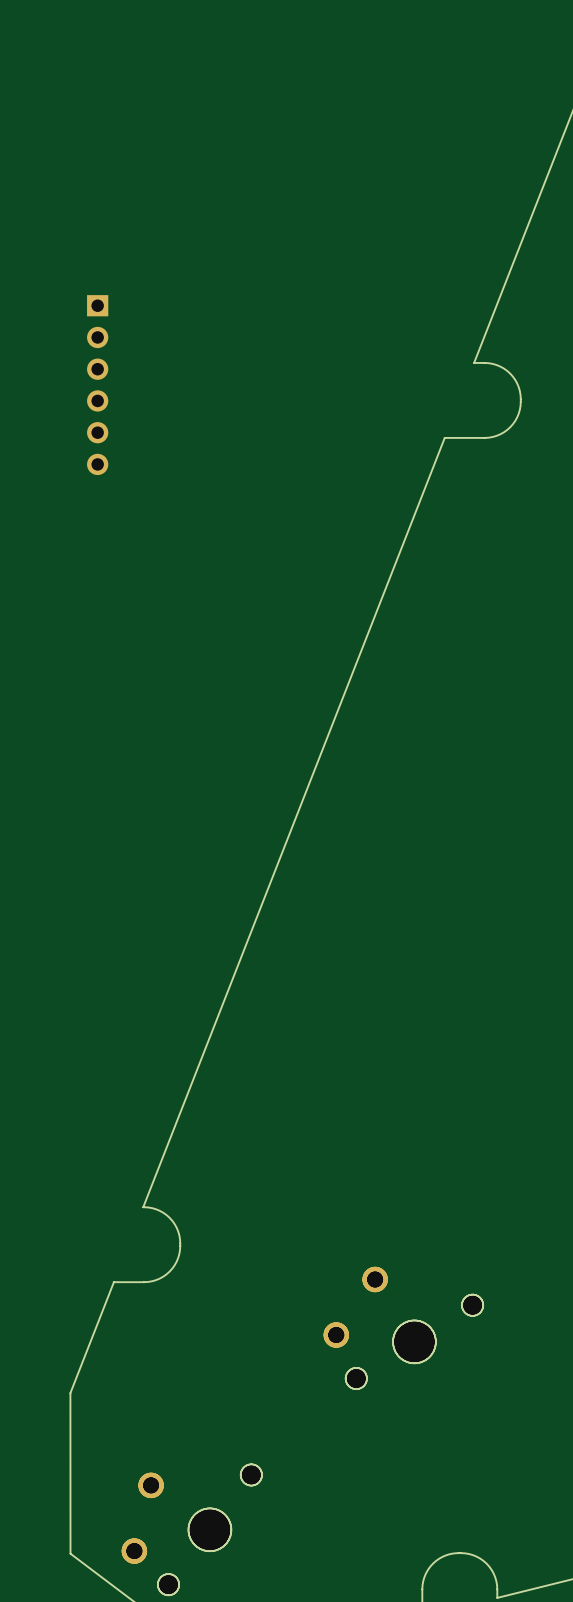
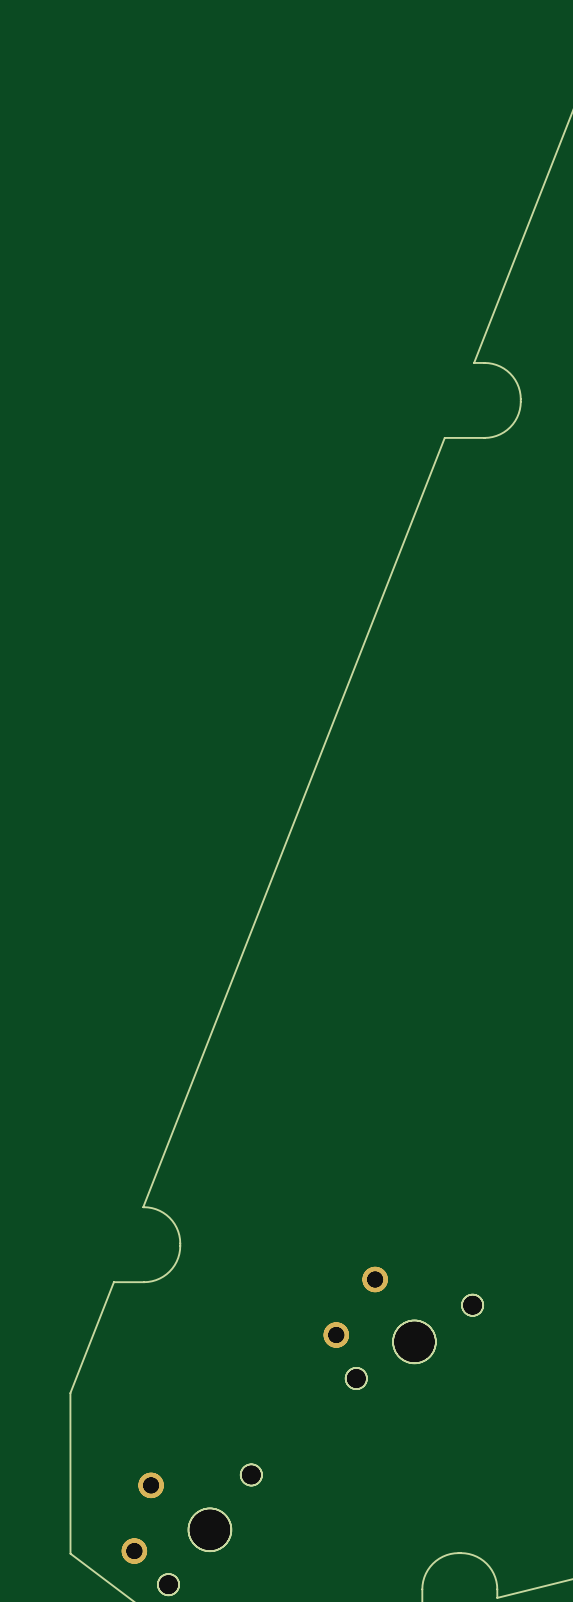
part: (97, 385) -> none

